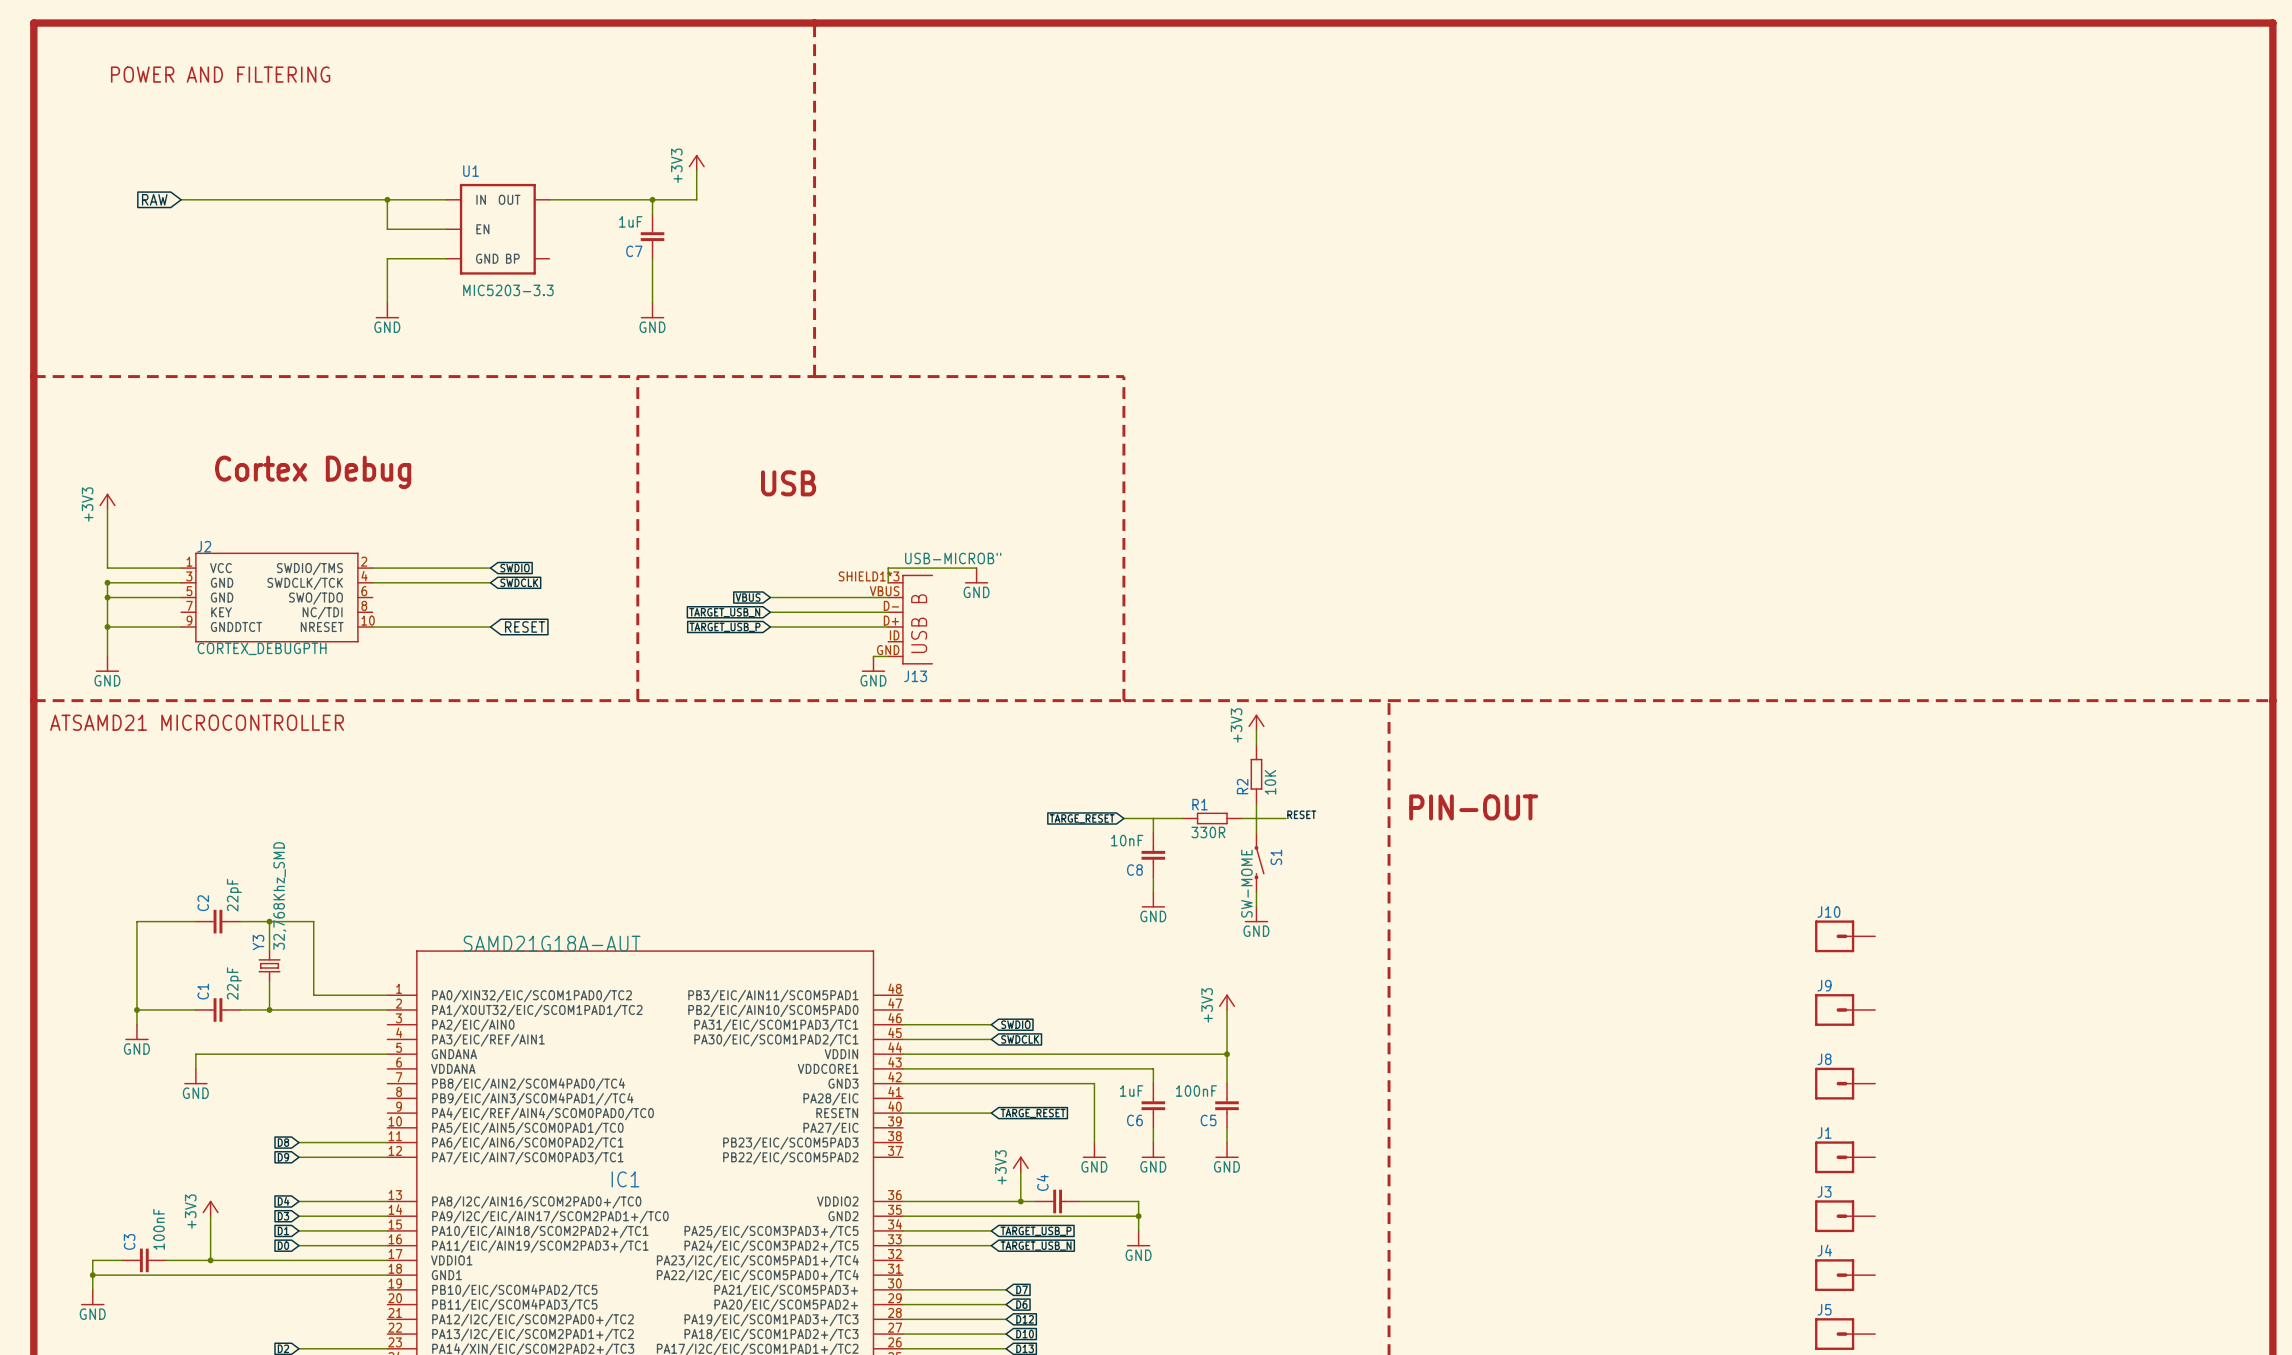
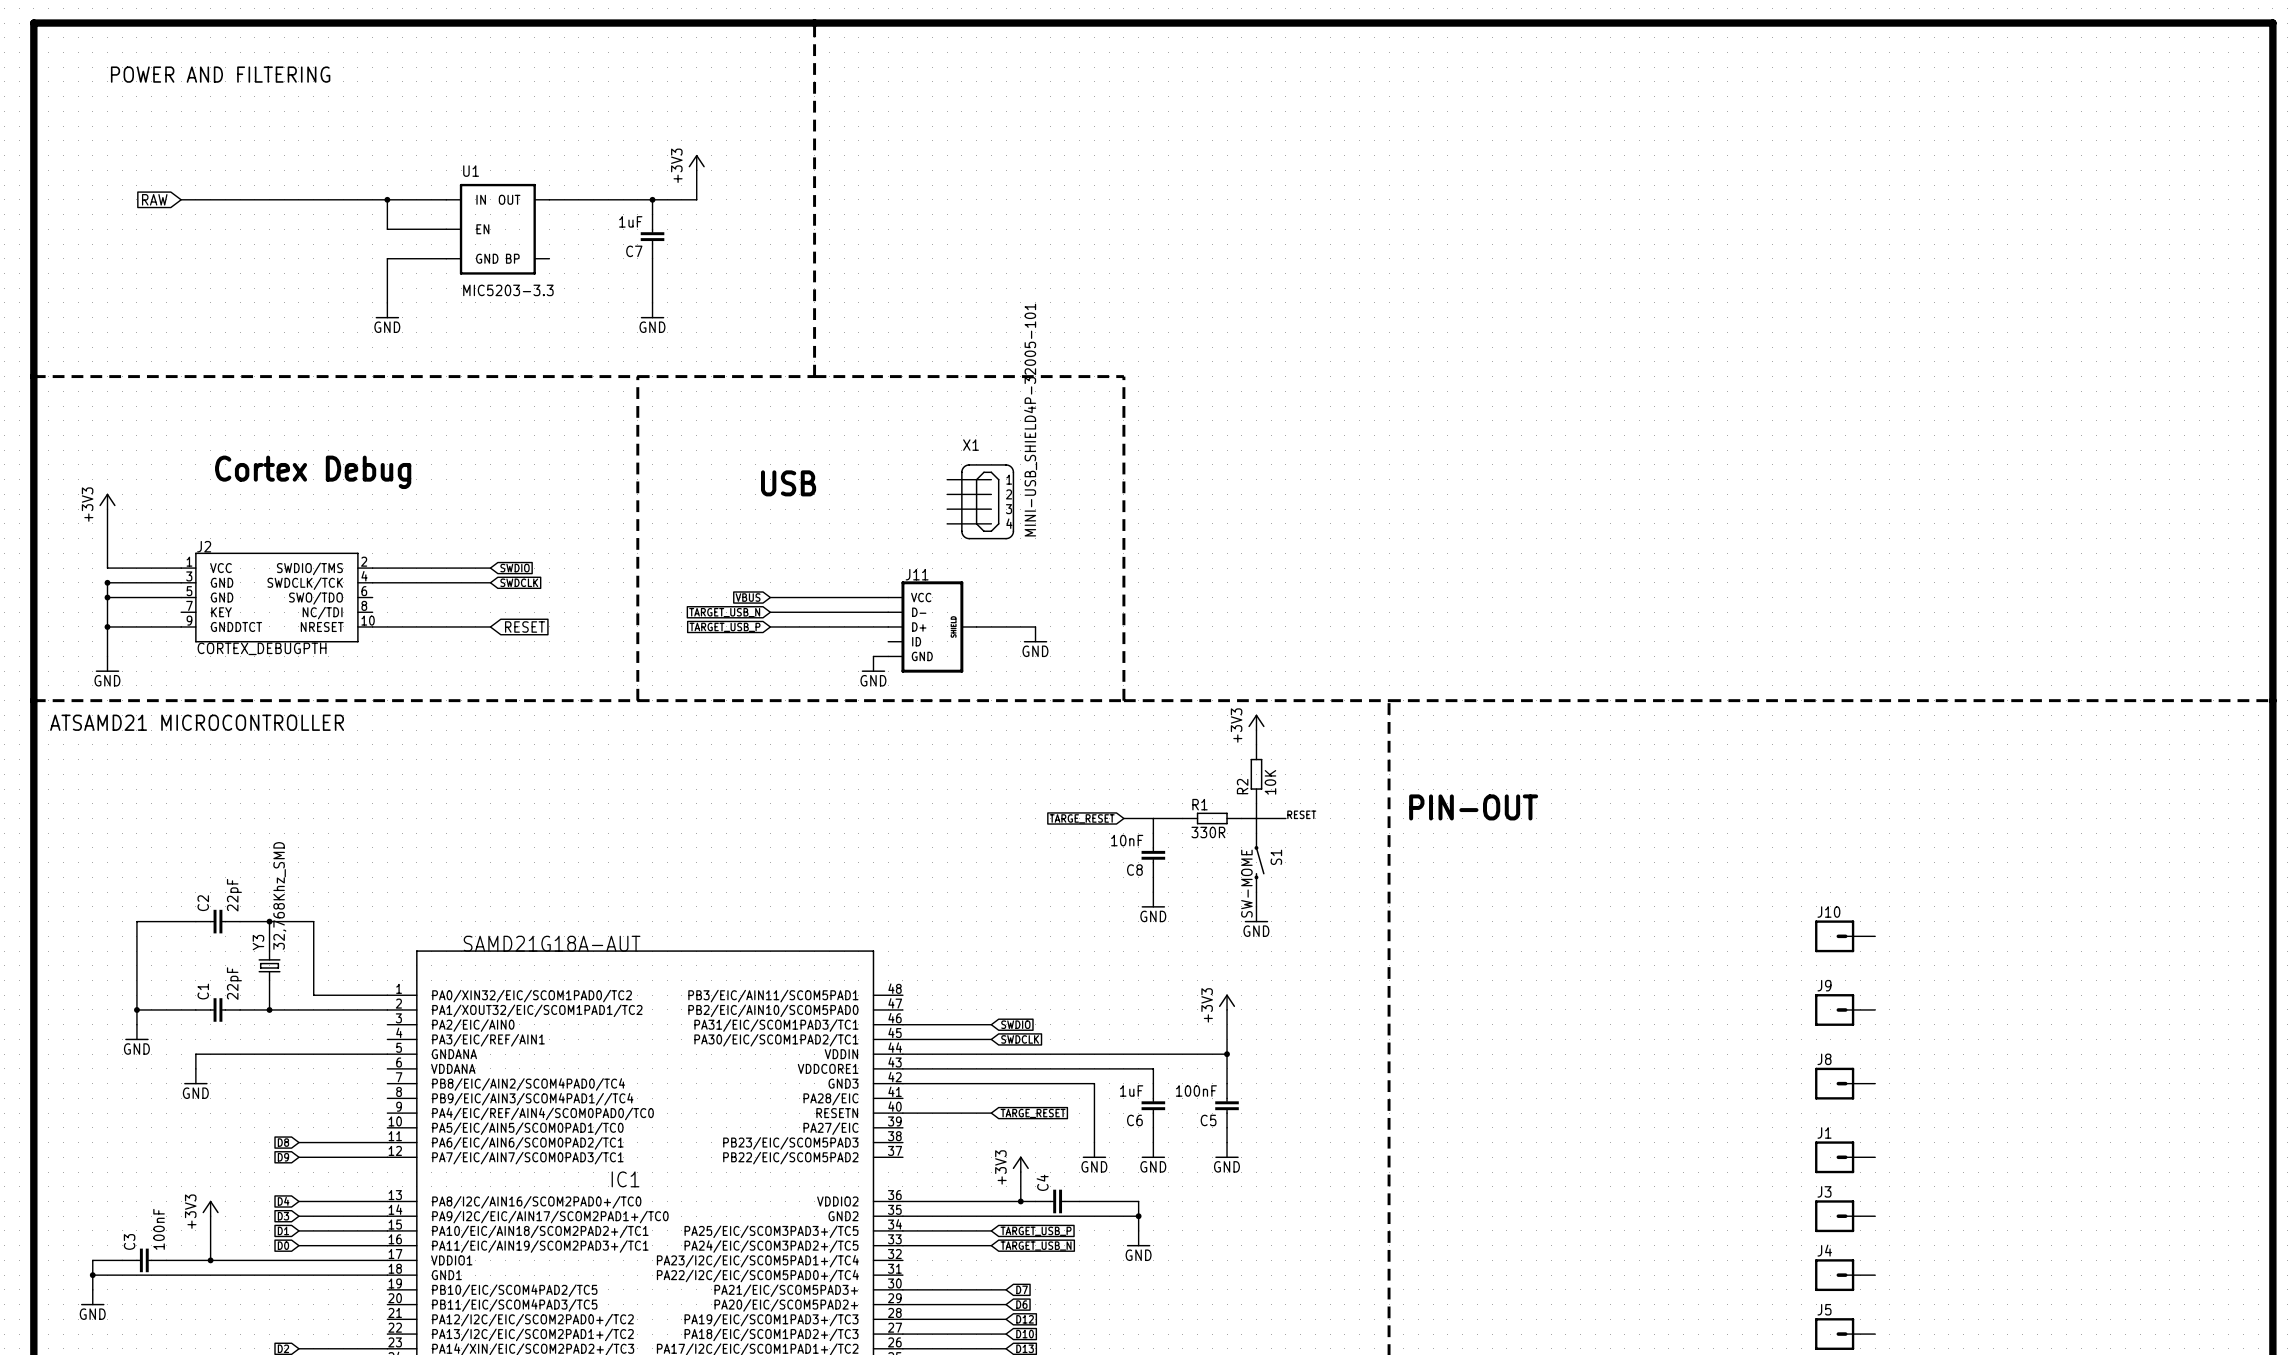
X1: none -> MINI-USB_SHIELD4P-32005-101 (980, 501)
wire: (976, 568) (888, 568) (888, 582) -> none
power symbol position: GND (976, 575) -> GND (1035, 634)
J13: USB-MICROB" (910, 619) -> none
J11: none -> (932, 626)
wire: none -> (976, 626) (1035, 626)

